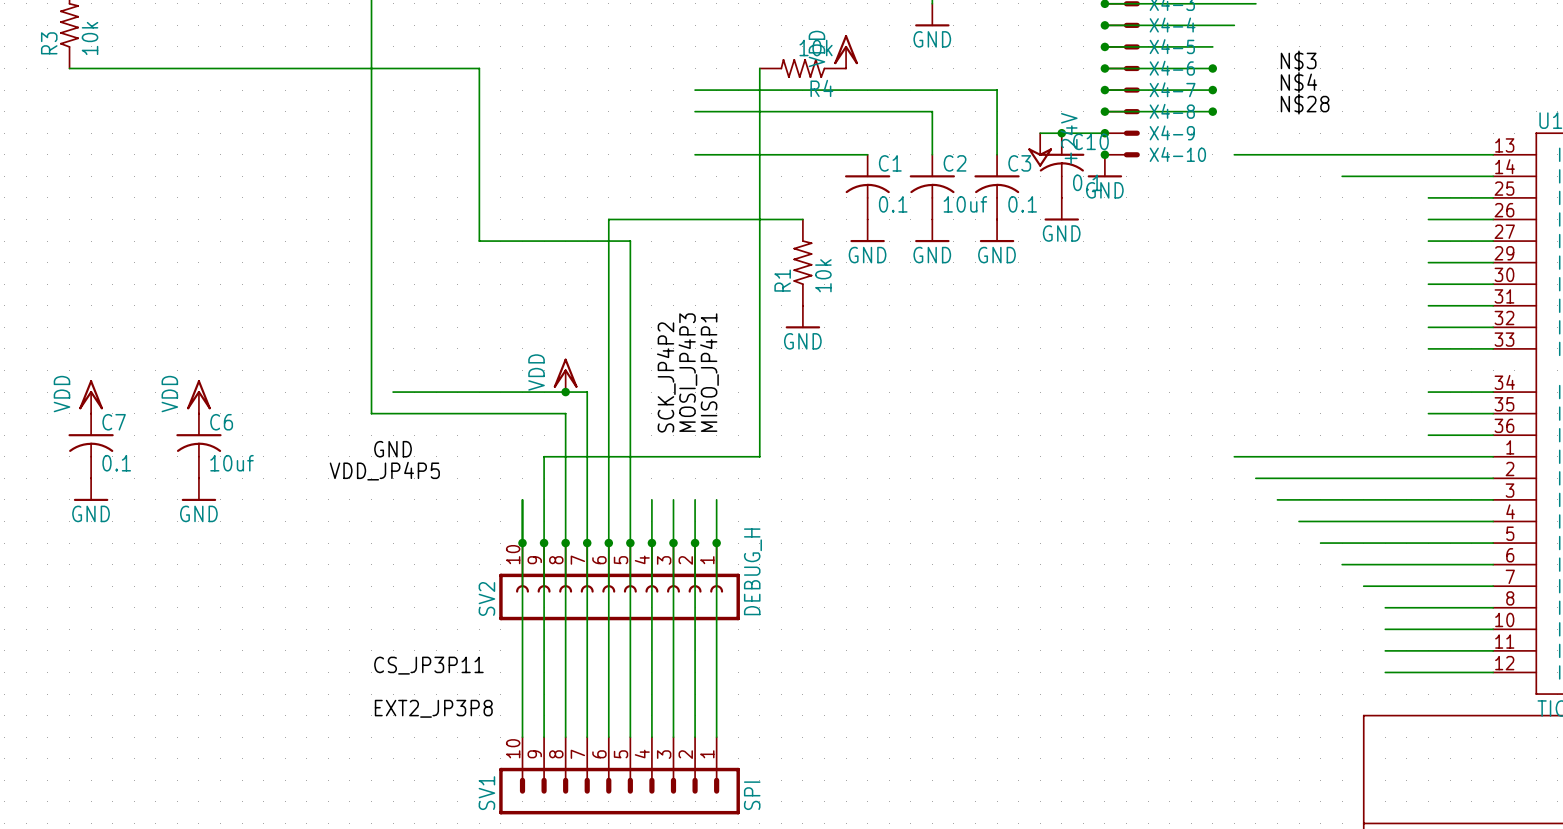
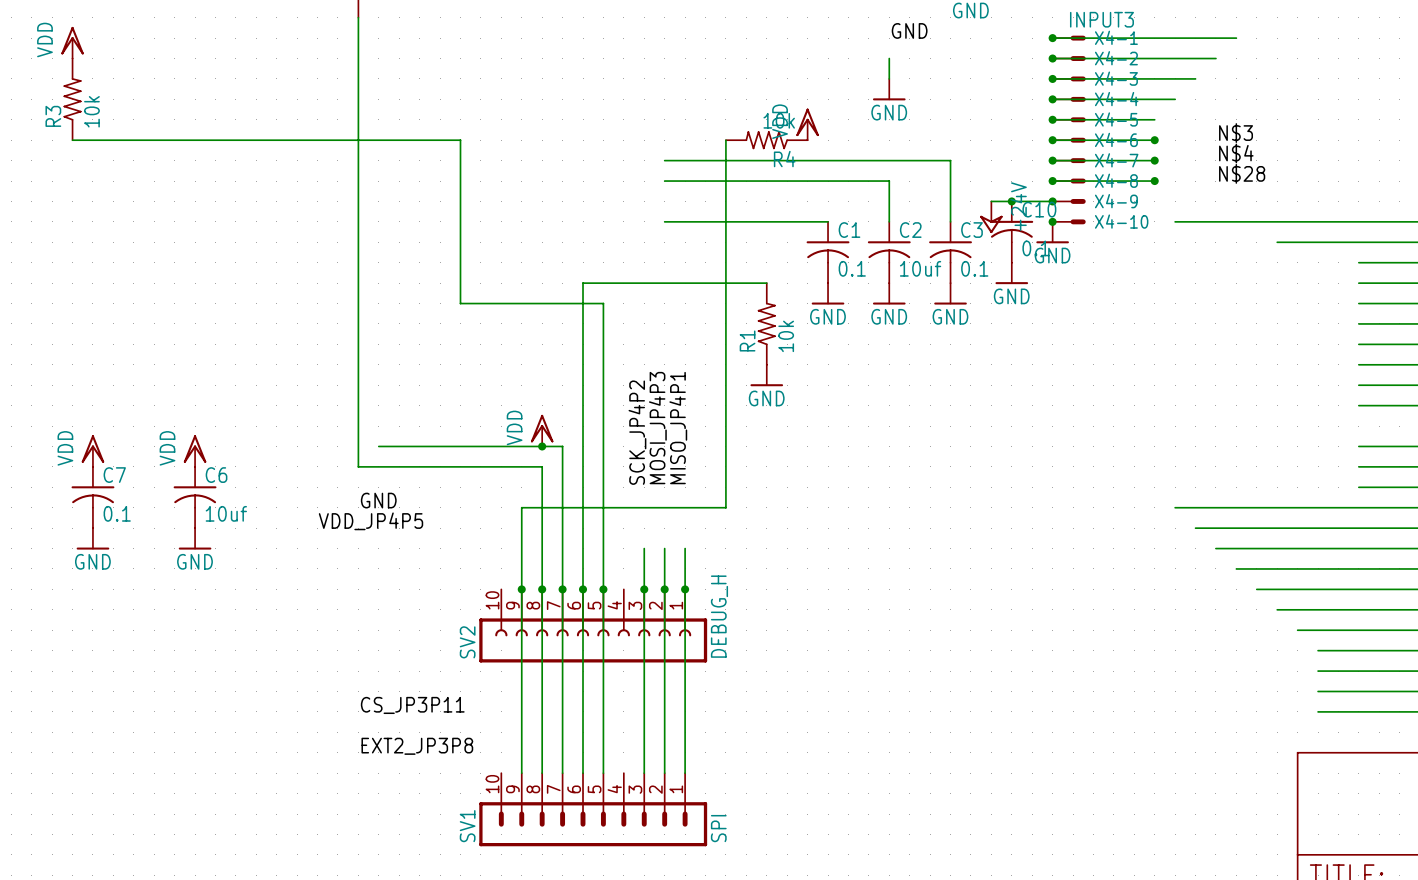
wire: (522, 499) (522, 737) -> none
wire: (651, 499) (651, 737) -> none
junction: (522, 543) -> none
junction: (651, 543) -> none

